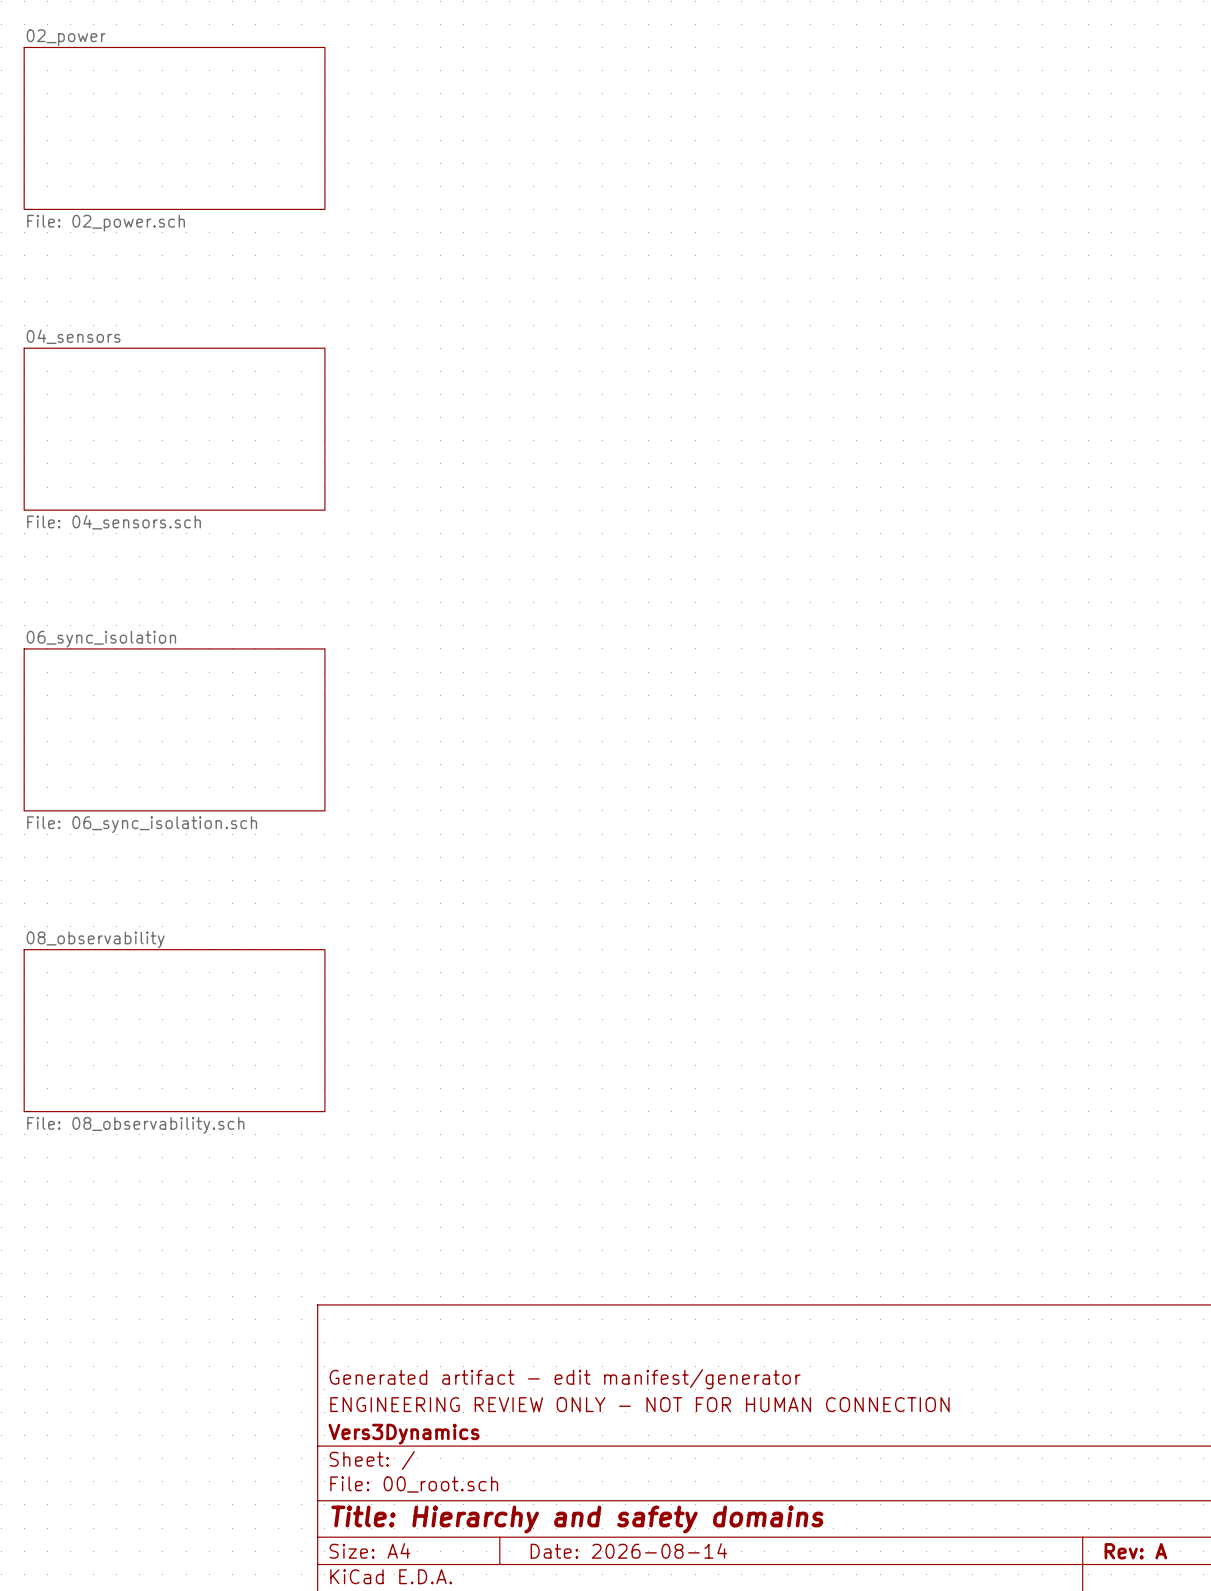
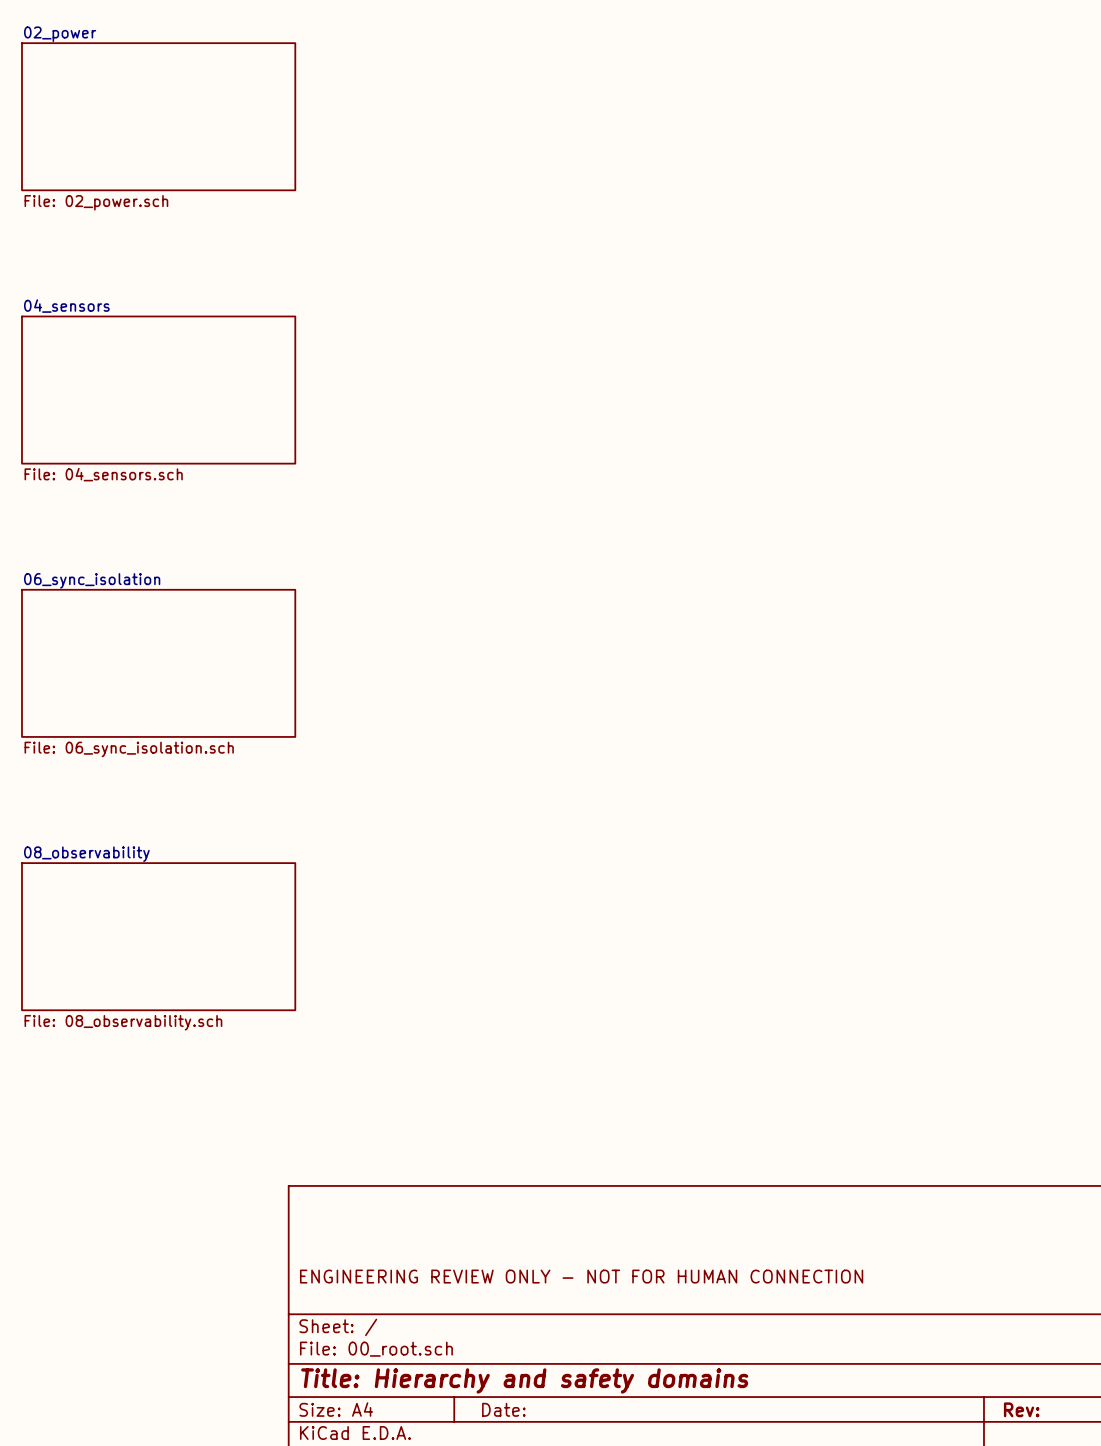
title block: Generated artifact - edit manifest/generator (565, 1379) -> none
title block: Vers3Dynamics (404, 1434) -> none
title block: Date: 2026-08-14 (628, 1550) -> Date: (503, 1409)
title block: Rev: A (1135, 1551) -> Rev: (1021, 1409)

